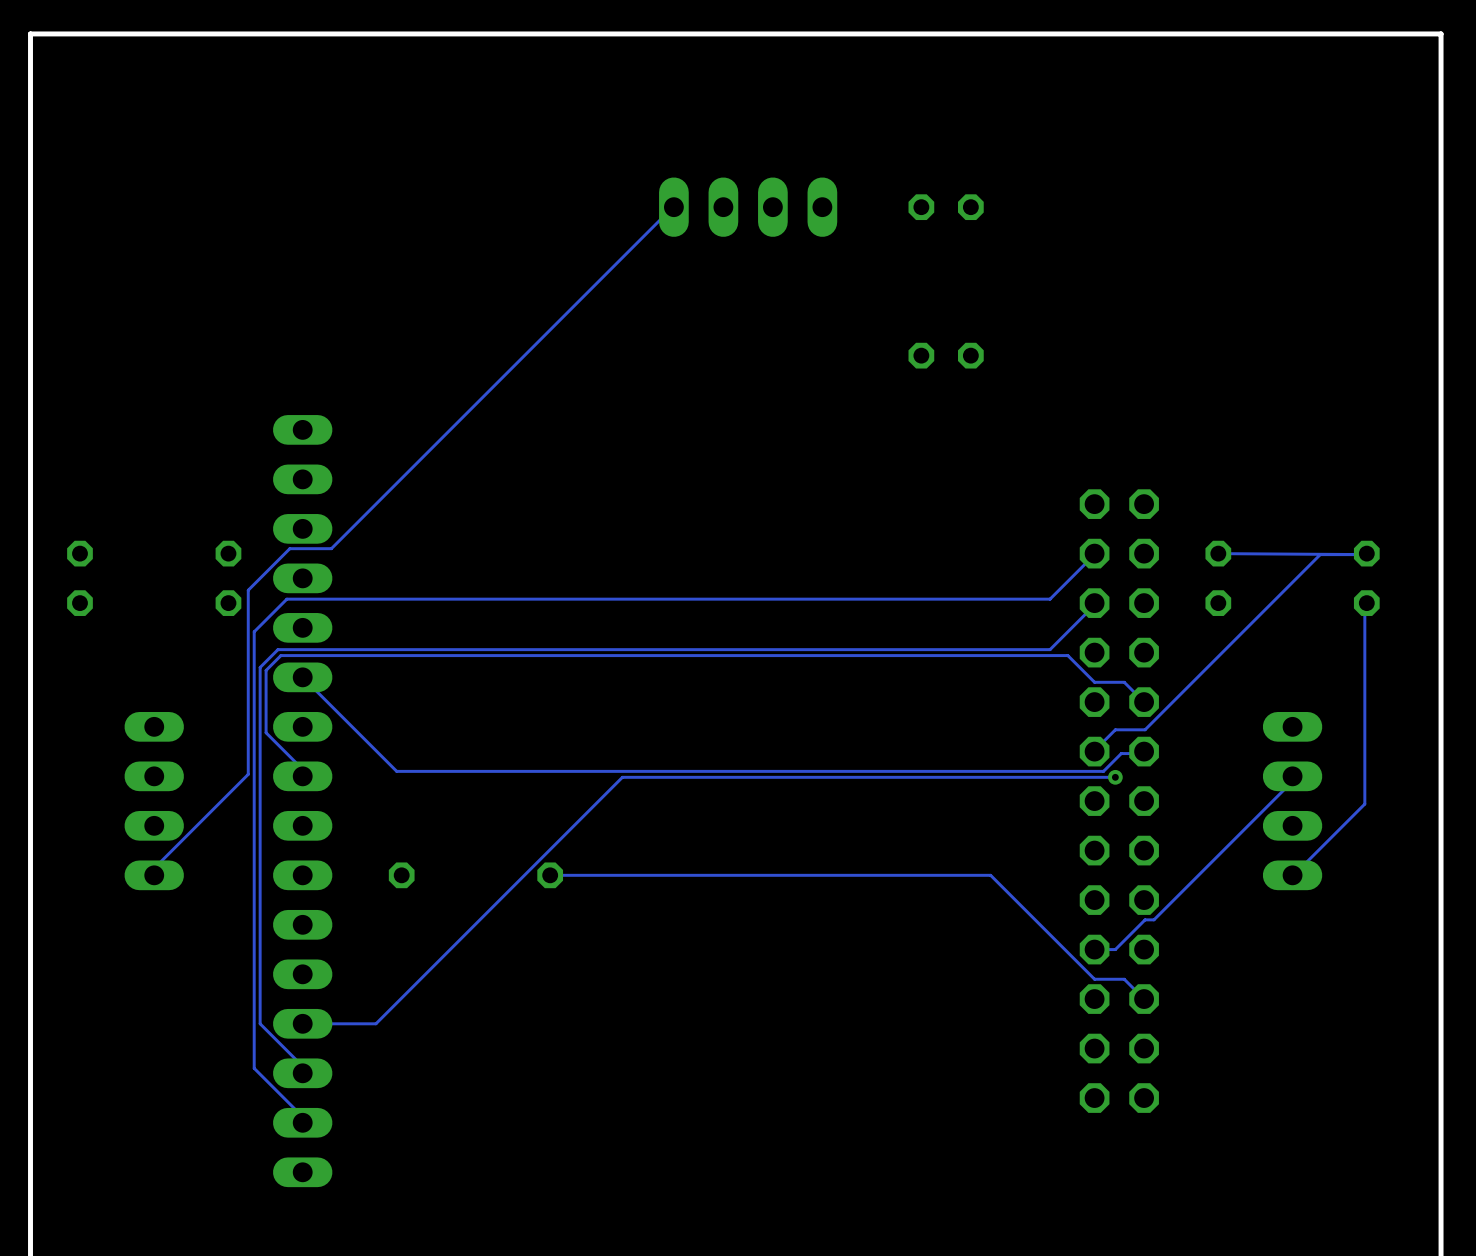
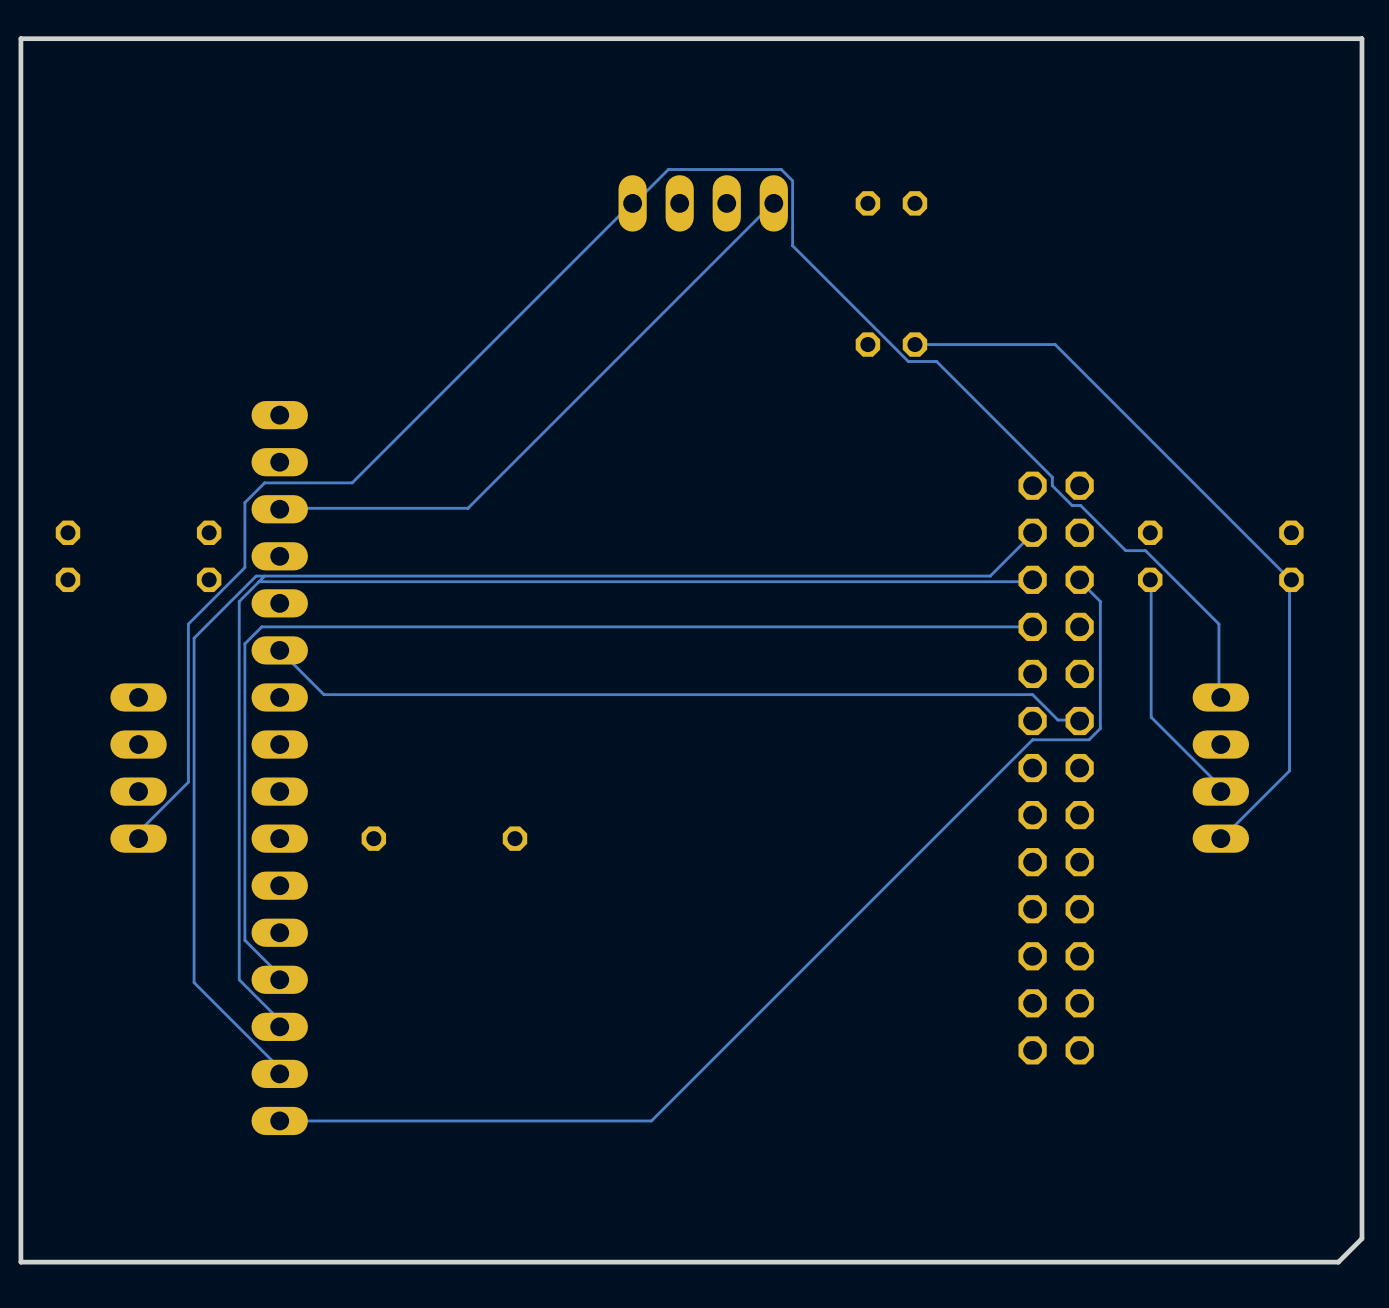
track: none -> (632, 203) (668, 169) (781, 169) (792, 180) (792, 245) (908, 361) (936, 361) (1052, 477) (1052, 485) (1072, 505) (1080, 505) (1125, 550) (1145, 550) (1218, 624) (1218, 697) (1220, 697)
track: none -> (773, 203) (467, 508) (279, 509)
track: none -> (914, 344) (1055, 344) (1291, 579)
track: (378, 501) (331, 548) (289, 548) (248, 590) (248, 774) (206, 815) -> (352, 482) (264, 482) (244, 502) (244, 567) (188, 624) (188, 782)
track: (1218, 553) (1364, 554) (1320, 554) (1145, 729) (1115, 729) (1094, 751) -> none
track: none -> (1150, 579) (1151, 717) (1218, 784) (1218, 790) (1220, 791)
track: (1094, 605) (1050, 649) (277, 649) (260, 667) -> (1032, 581) (259, 581)
track: (260, 625) (254, 631) (254, 1068) -> (264, 576) (256, 576) (194, 638) (194, 982) (233, 1022)
track: none -> (239, 601) (239, 641)
track: (280, 655) (1067, 655) (1094, 682) (1124, 682) (1144, 702) -> (259, 629) (261, 626) (1032, 626)
track: (349, 723) (396, 771) (1094, 771) -> (323, 694) (1032, 694) (1058, 720) (1079, 721)
track: (266, 732) (301, 768) (302, 776) -> (244, 703) (244, 940) (278, 974) (279, 979)
track: (1144, 751) (1142, 753) (1121, 753) (1103, 771) -> (1079, 579) (1100, 601) (1100, 728) (1089, 739) (1041, 739)
track: none -> (1032, 739) (651, 1120) (279, 1120)
track: (1292, 776) (1290, 777) (1290, 783) (1153, 919) (1145, 919) (1115, 949) (1094, 949) -> none
track: (1115, 777) (622, 777) (375, 1023) (302, 1023) -> none
via: (1115, 777) -> none
track: (550, 875) (990, 875) (1094, 979) (1124, 979) (1144, 999) -> none

